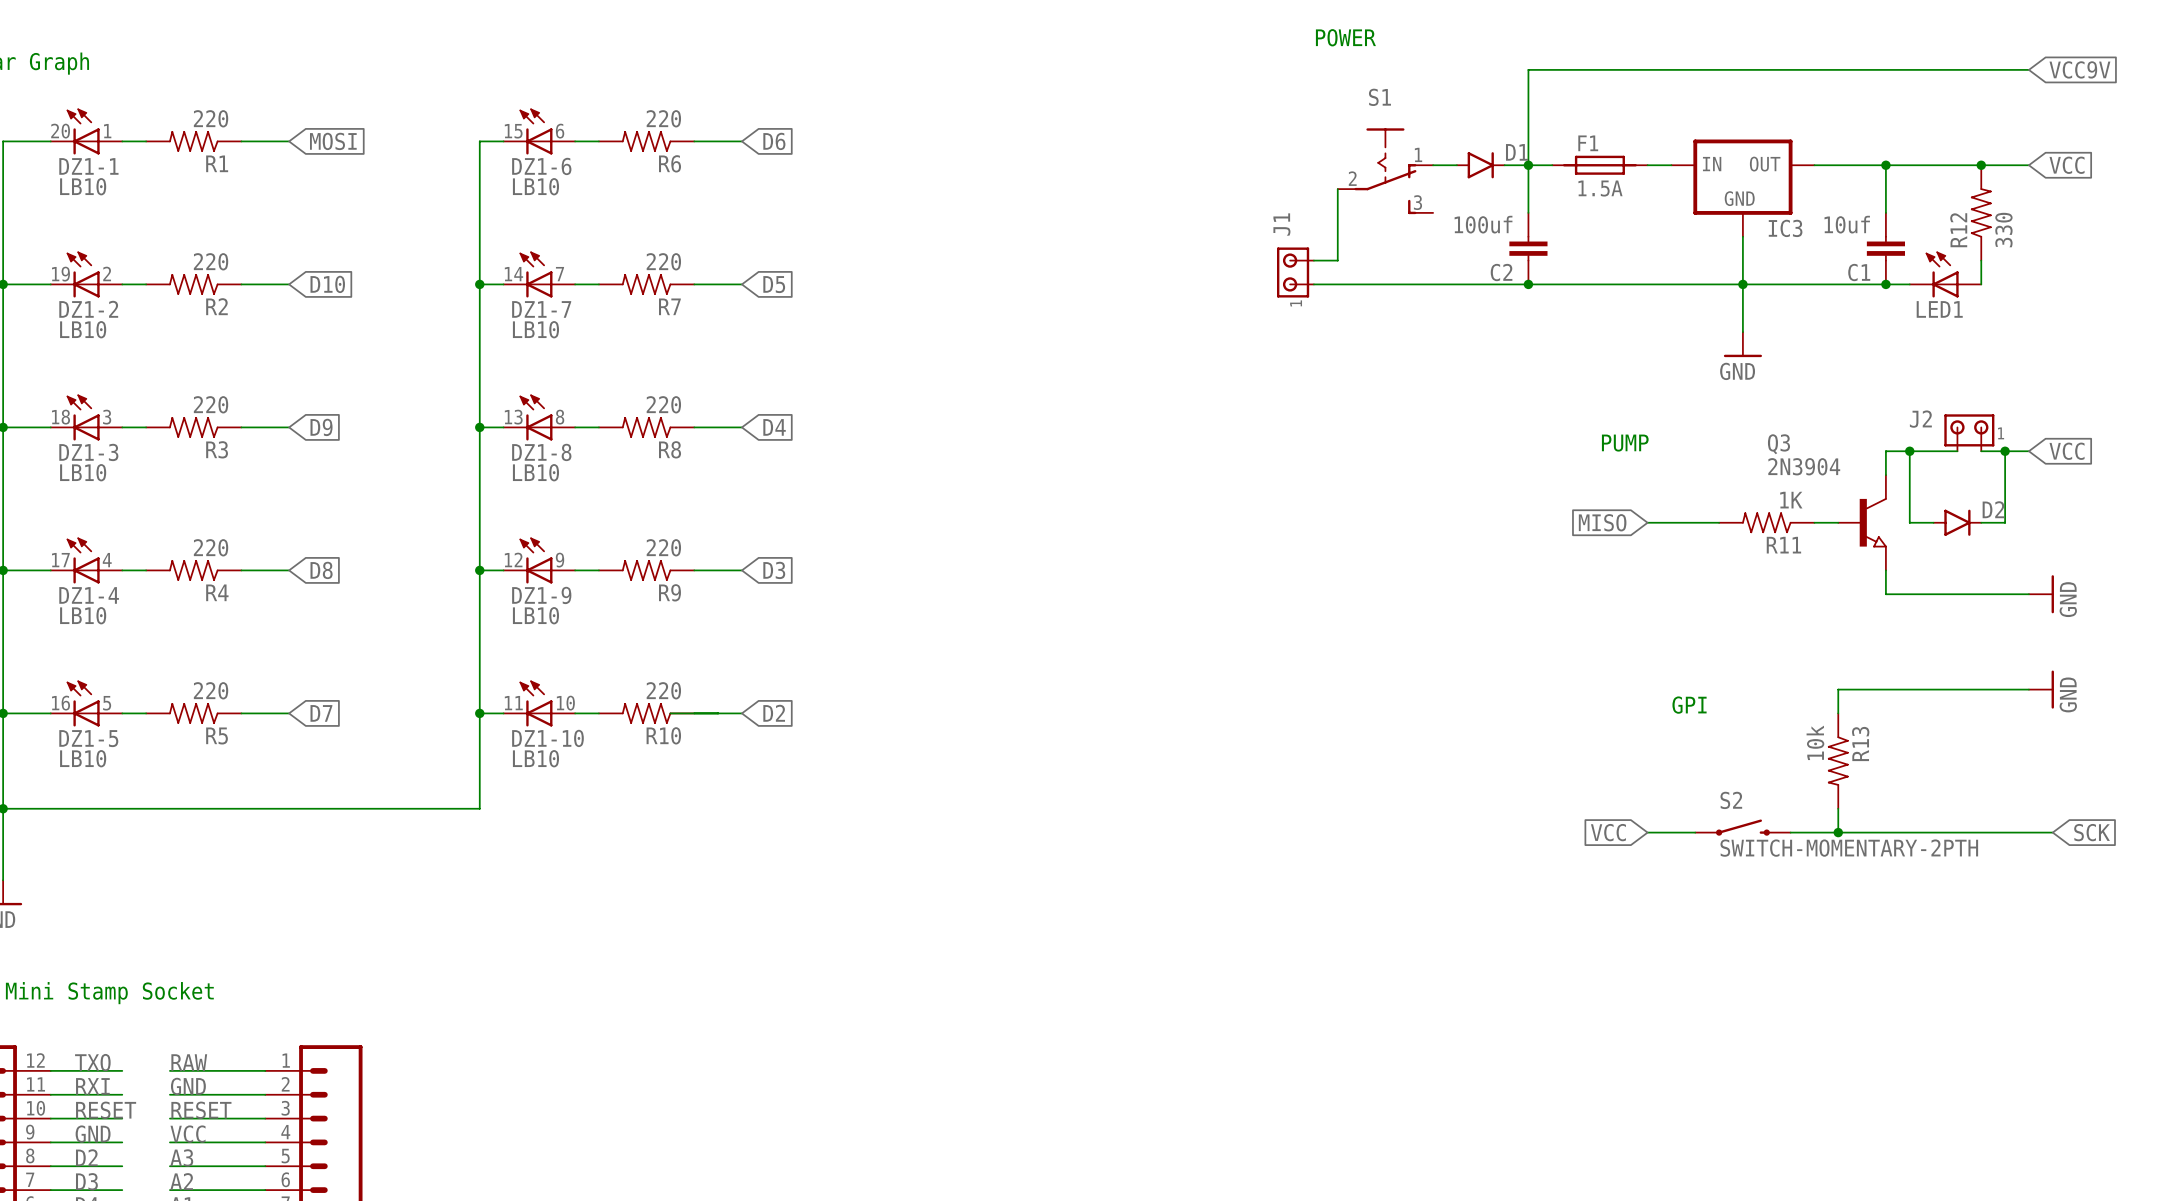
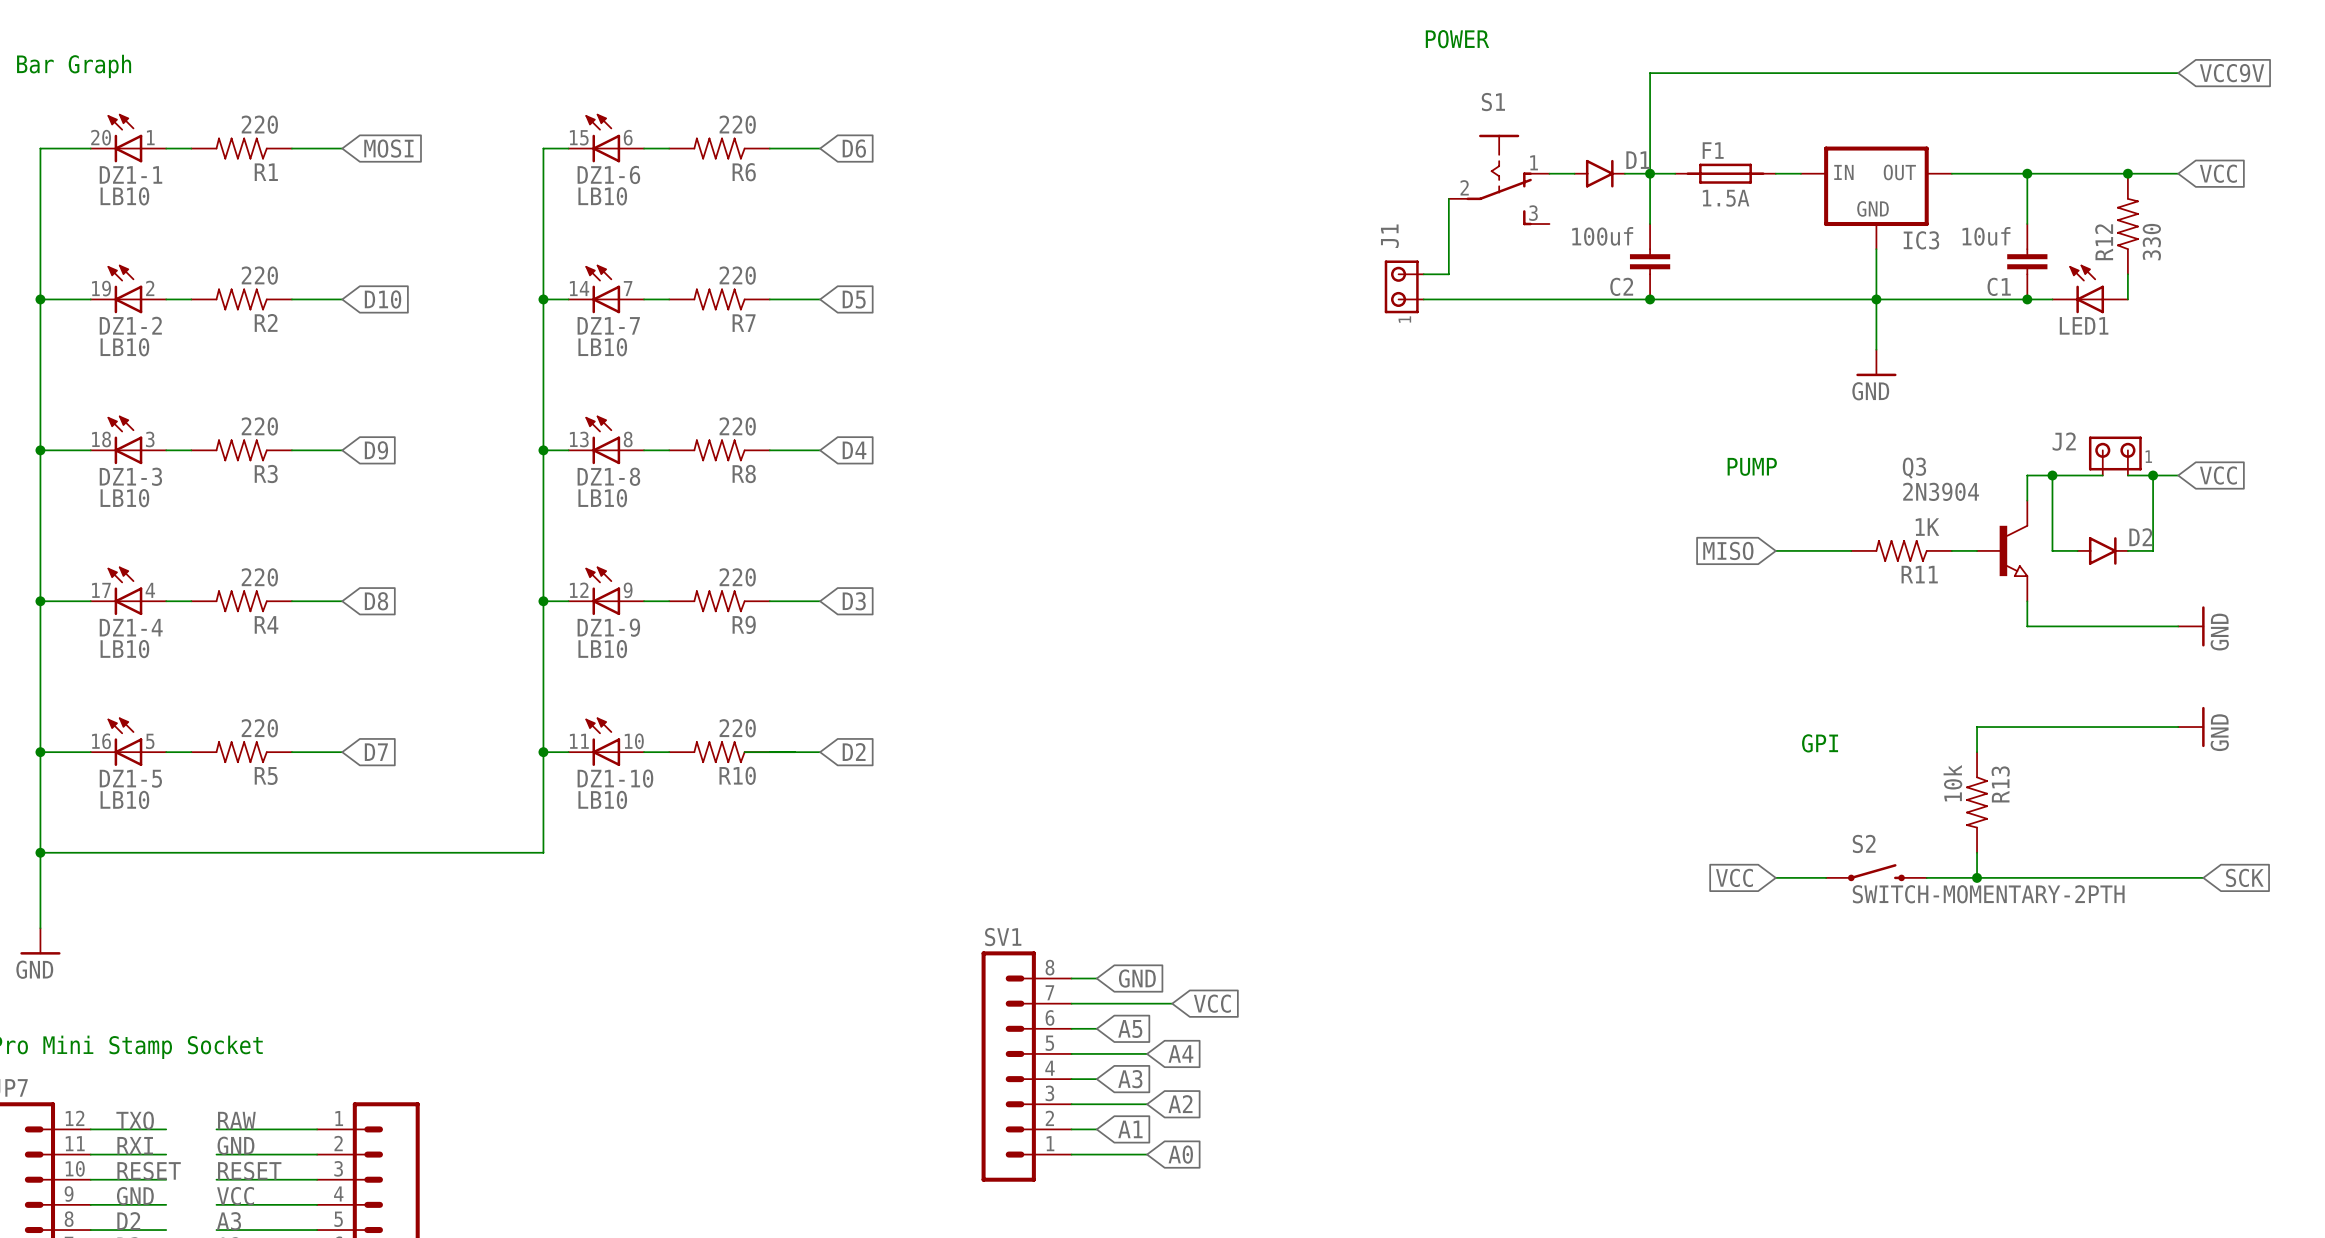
wire: none -> (1071, 978) (1096, 978)
global label: none -> GND (1137, 978)
wire: none -> (1071, 1003) (1172, 1003)
global label: none -> VCC (1212, 1003)
wire: none -> (1071, 1028) (1096, 1028)
global label: none -> A5 (1130, 1028)
wire: none -> (1071, 1053) (1147, 1053)
global label: none -> A4 (1180, 1053)
SV1: none -> (1026, 1066)
wire: none -> (1071, 1079) (1096, 1079)
global label: none -> A3 (1130, 1079)
global label: none -> A2 (1180, 1104)
wire: none -> (1071, 1104) (1147, 1104)
wire: none -> (1071, 1129) (1096, 1129)
global label: none -> A1 (1130, 1129)
wire: none -> (1071, 1154) (1147, 1154)
global label: none -> A0 (1180, 1154)

